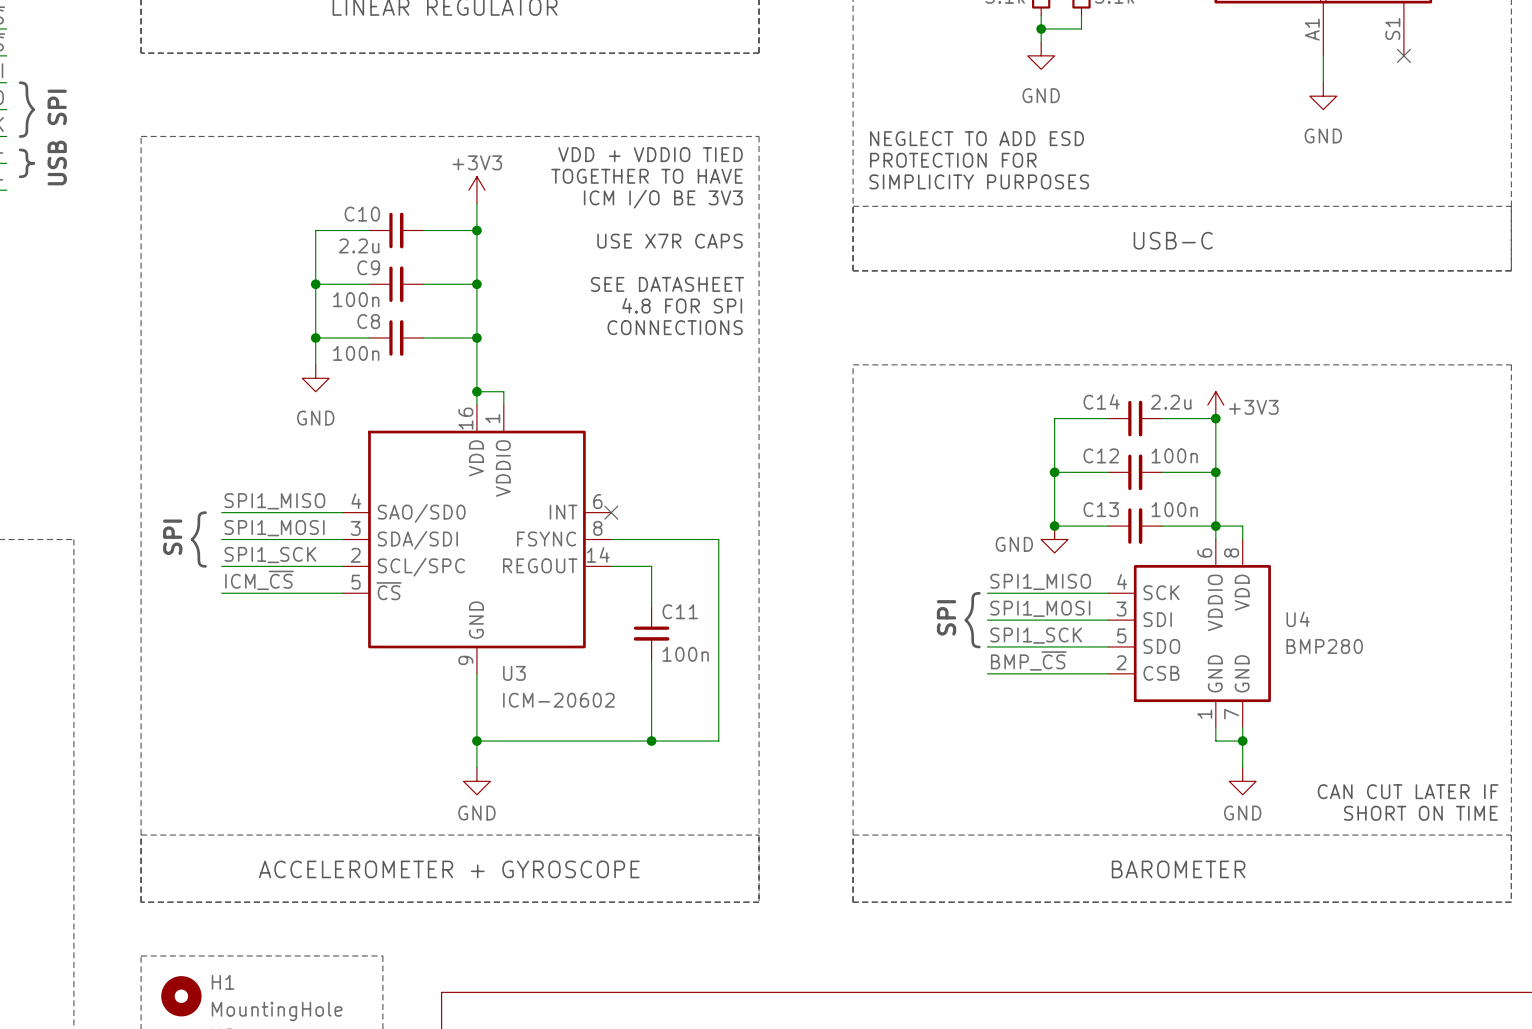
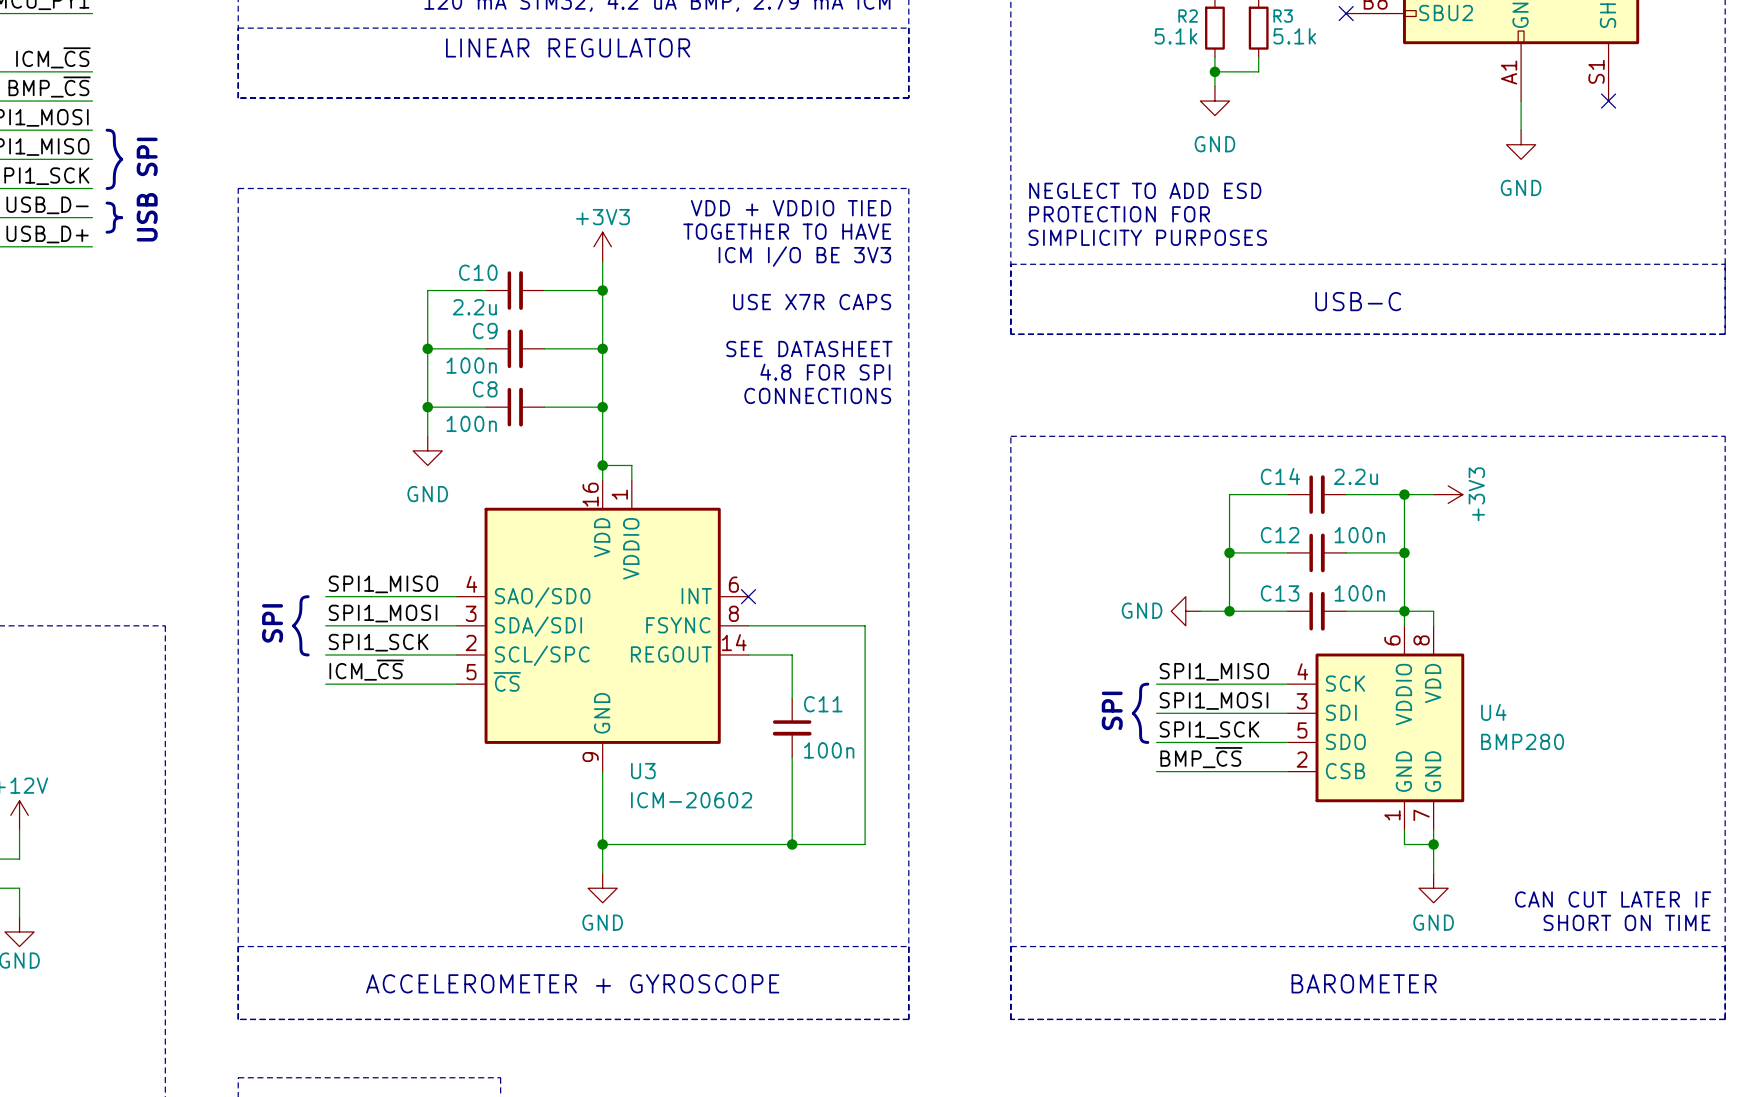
power symbol rotation: 0° (1215, 405) -> 90° clockwise (1448, 494)
power symbol position: +3V3 (1215, 405) -> +3V3 (1448, 494)
wire: none -> (1404, 494) (1433, 494)
wire: none -> (1200, 611) (1229, 611)
power symbol rotation: 0° (1054, 539) -> 90° clockwise (1185, 611)
power symbol position: GND (1054, 539) -> GND (1185, 611)

